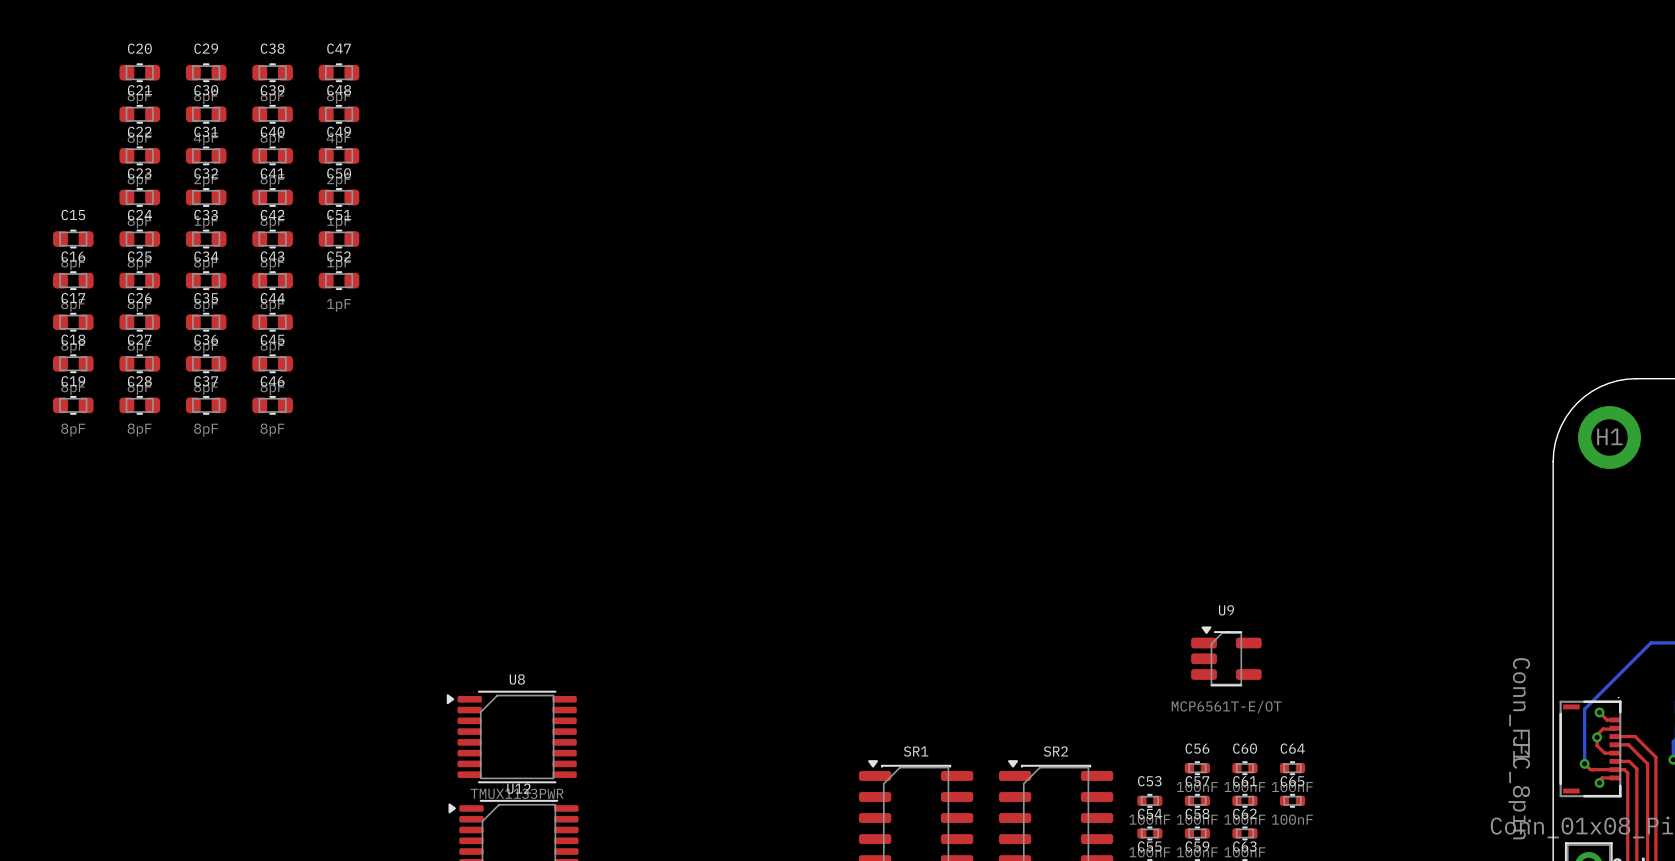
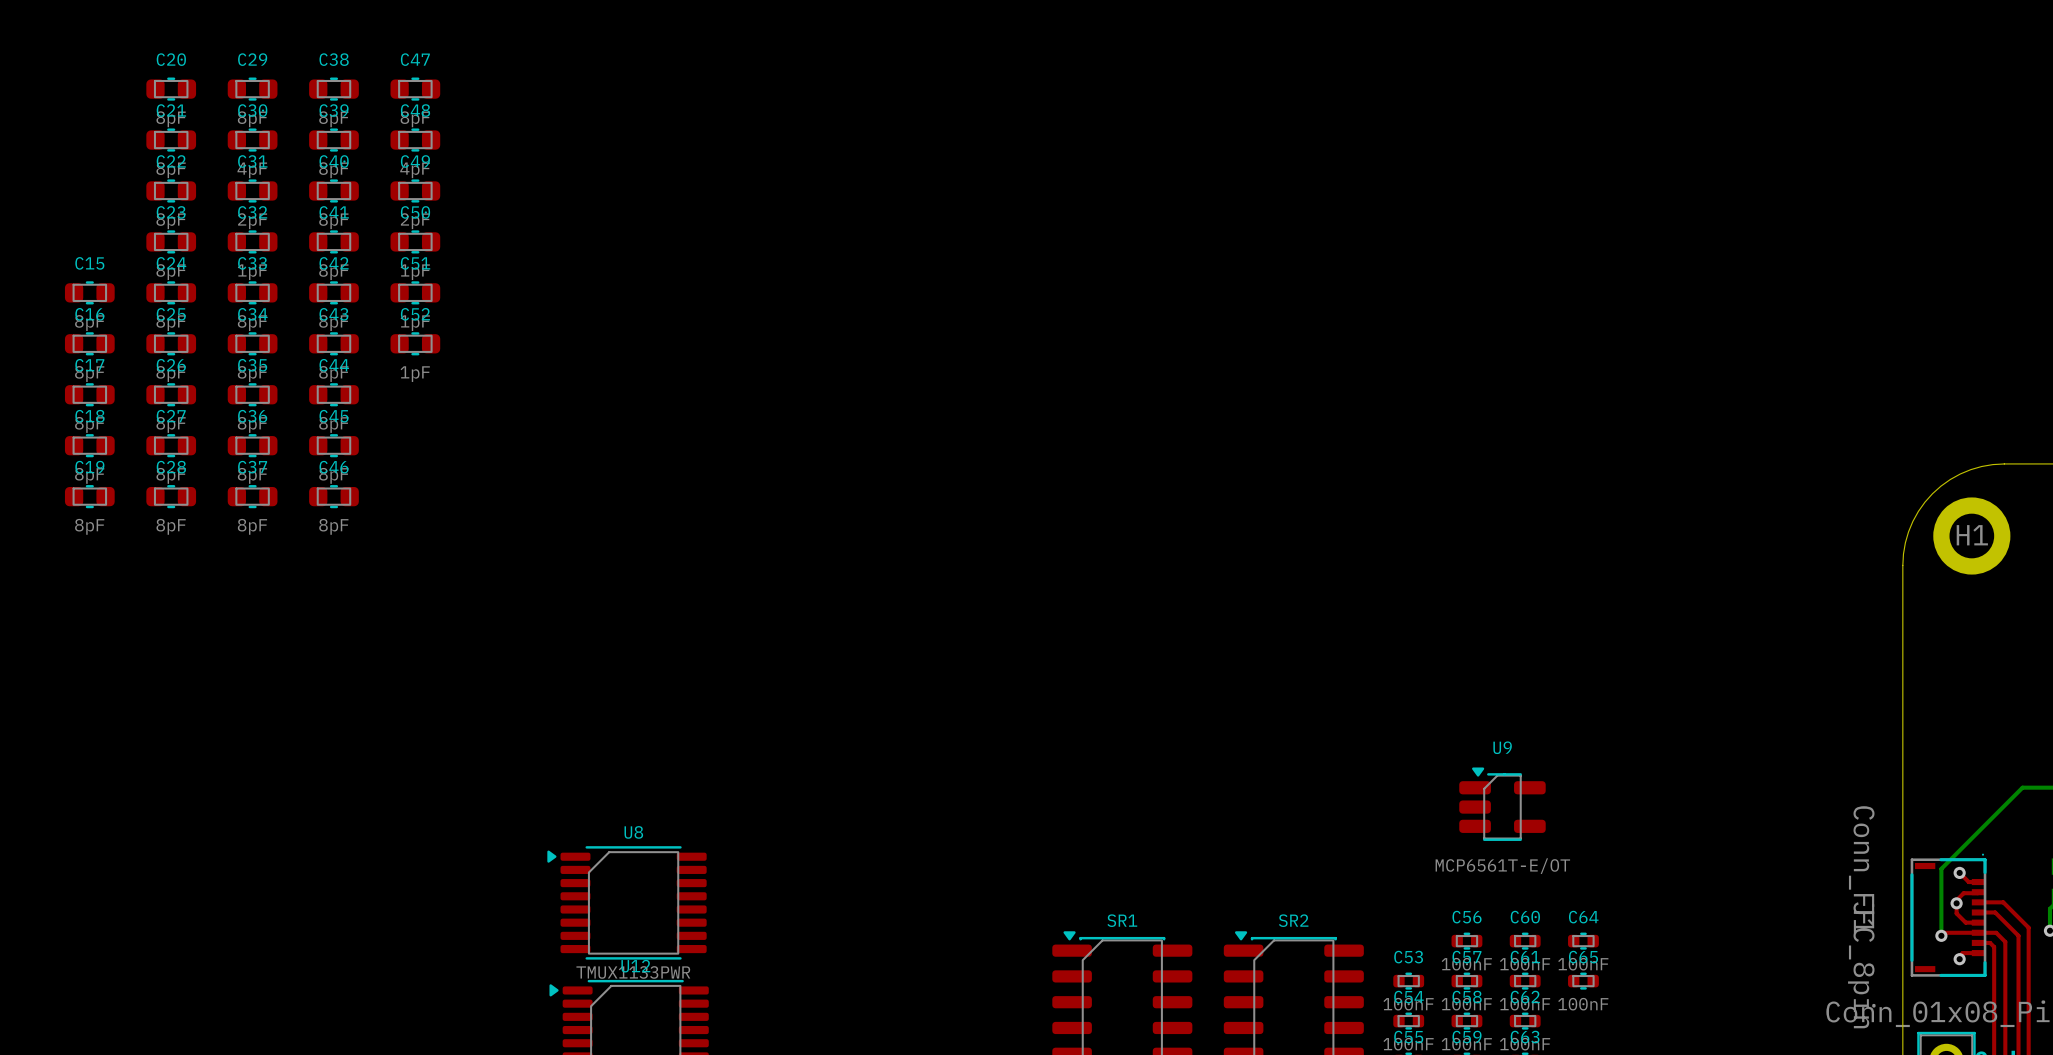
top track: none -> (1941, 932) (1978, 932)
top track: (1584, 763) (1590, 769) (1615, 769) -> none

